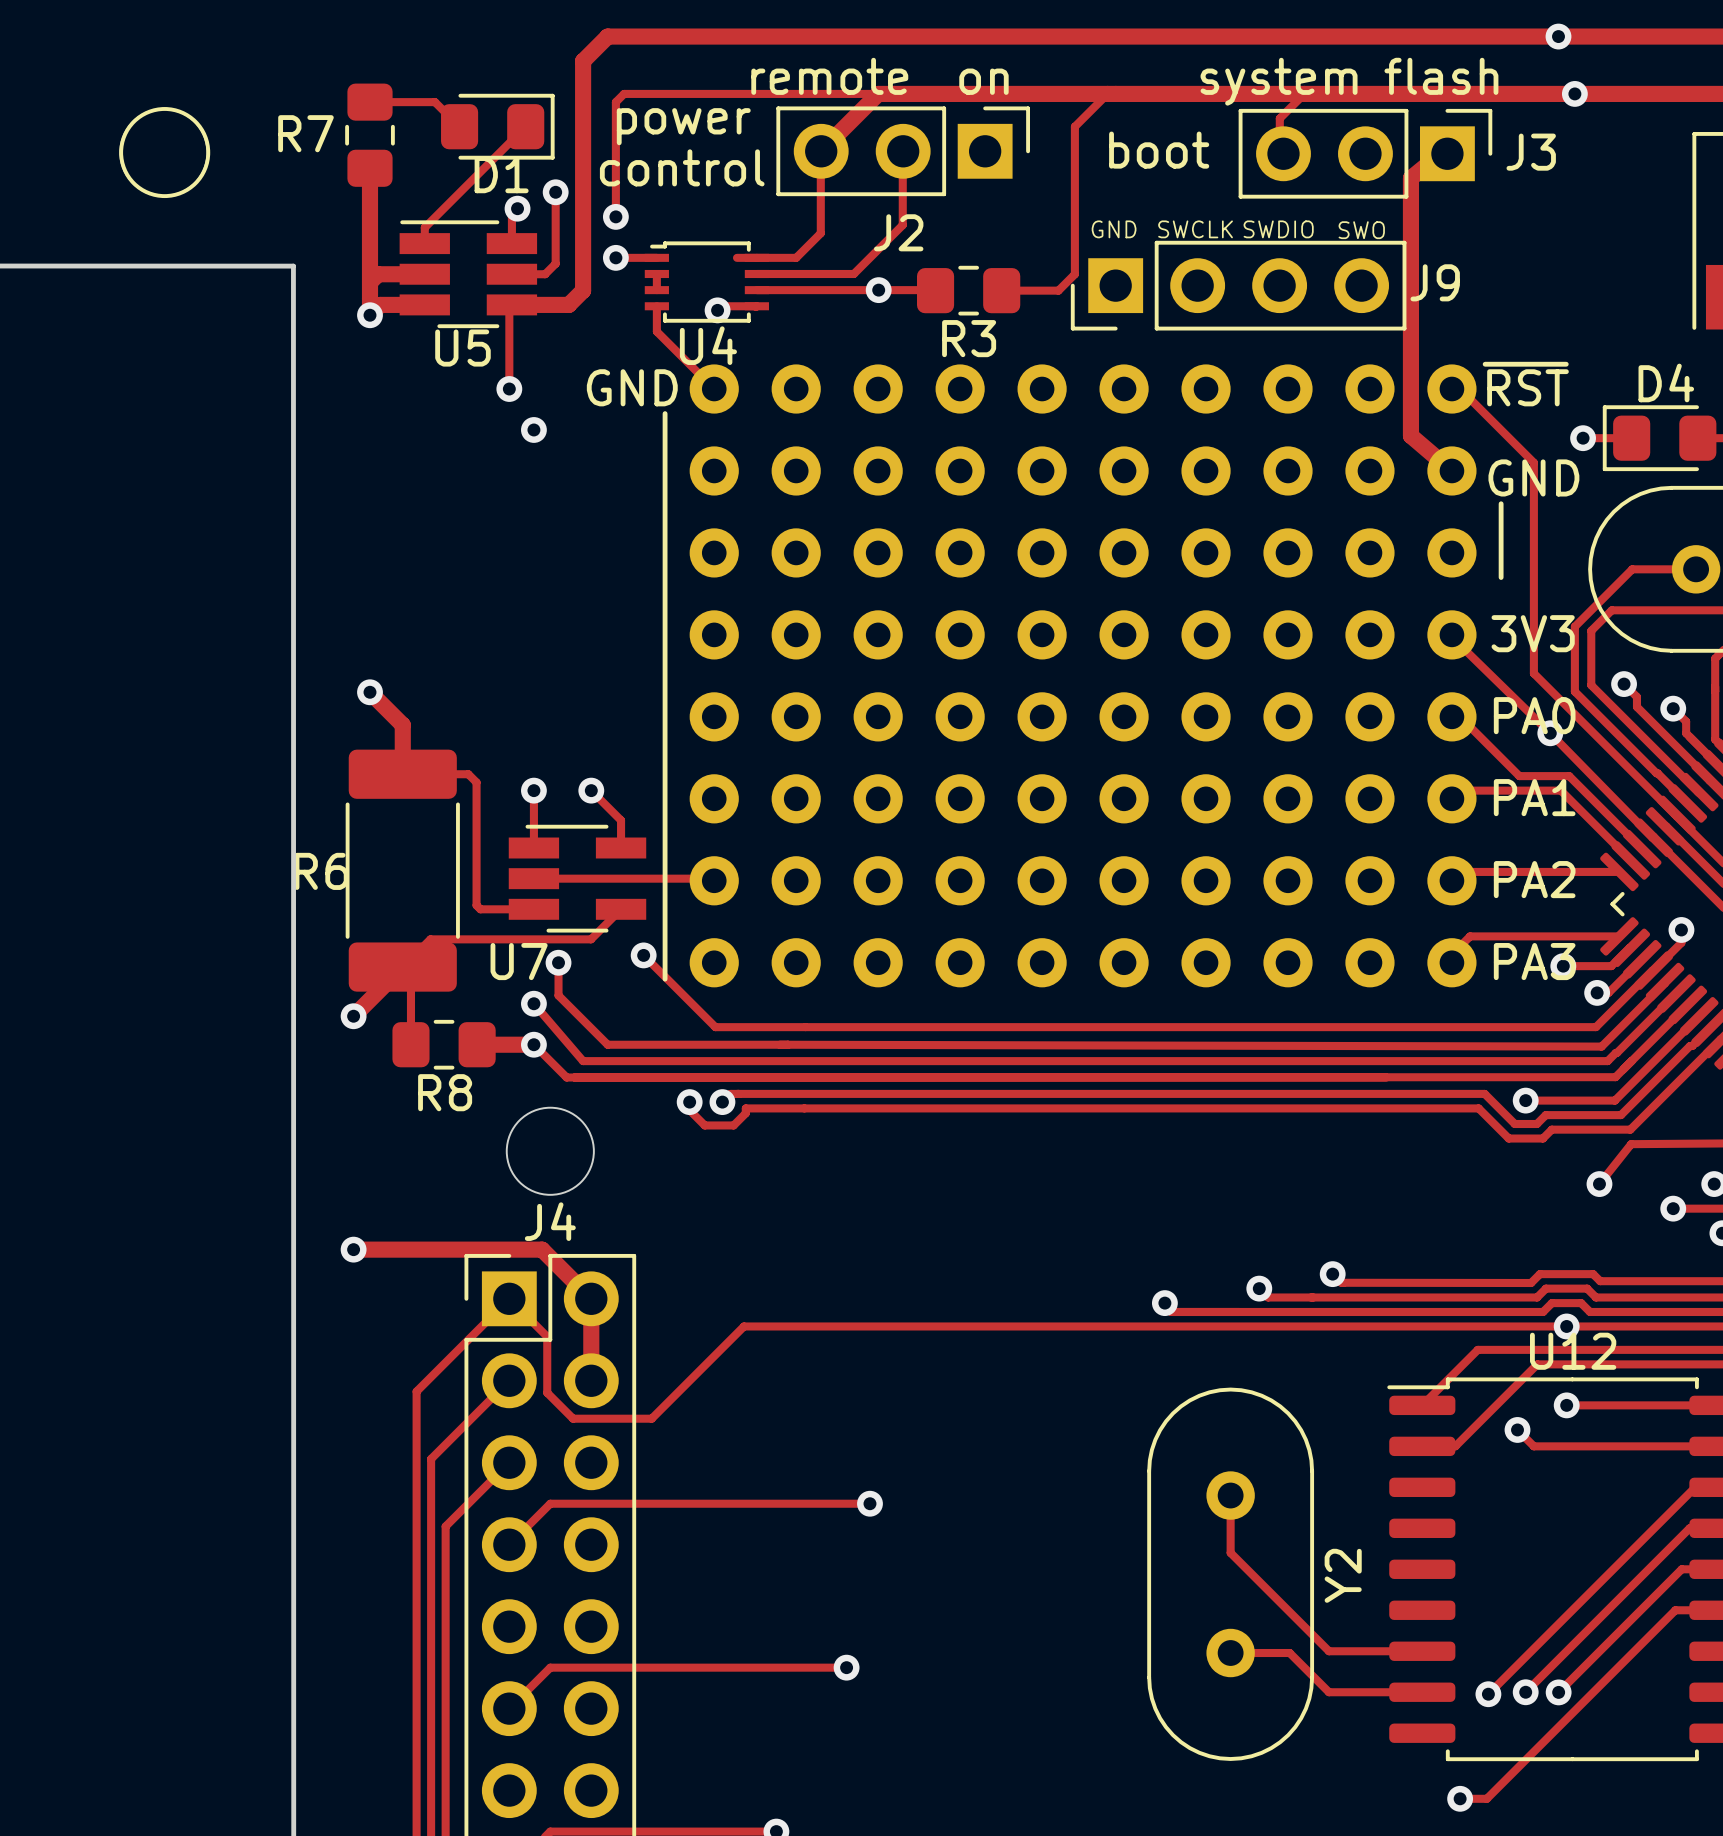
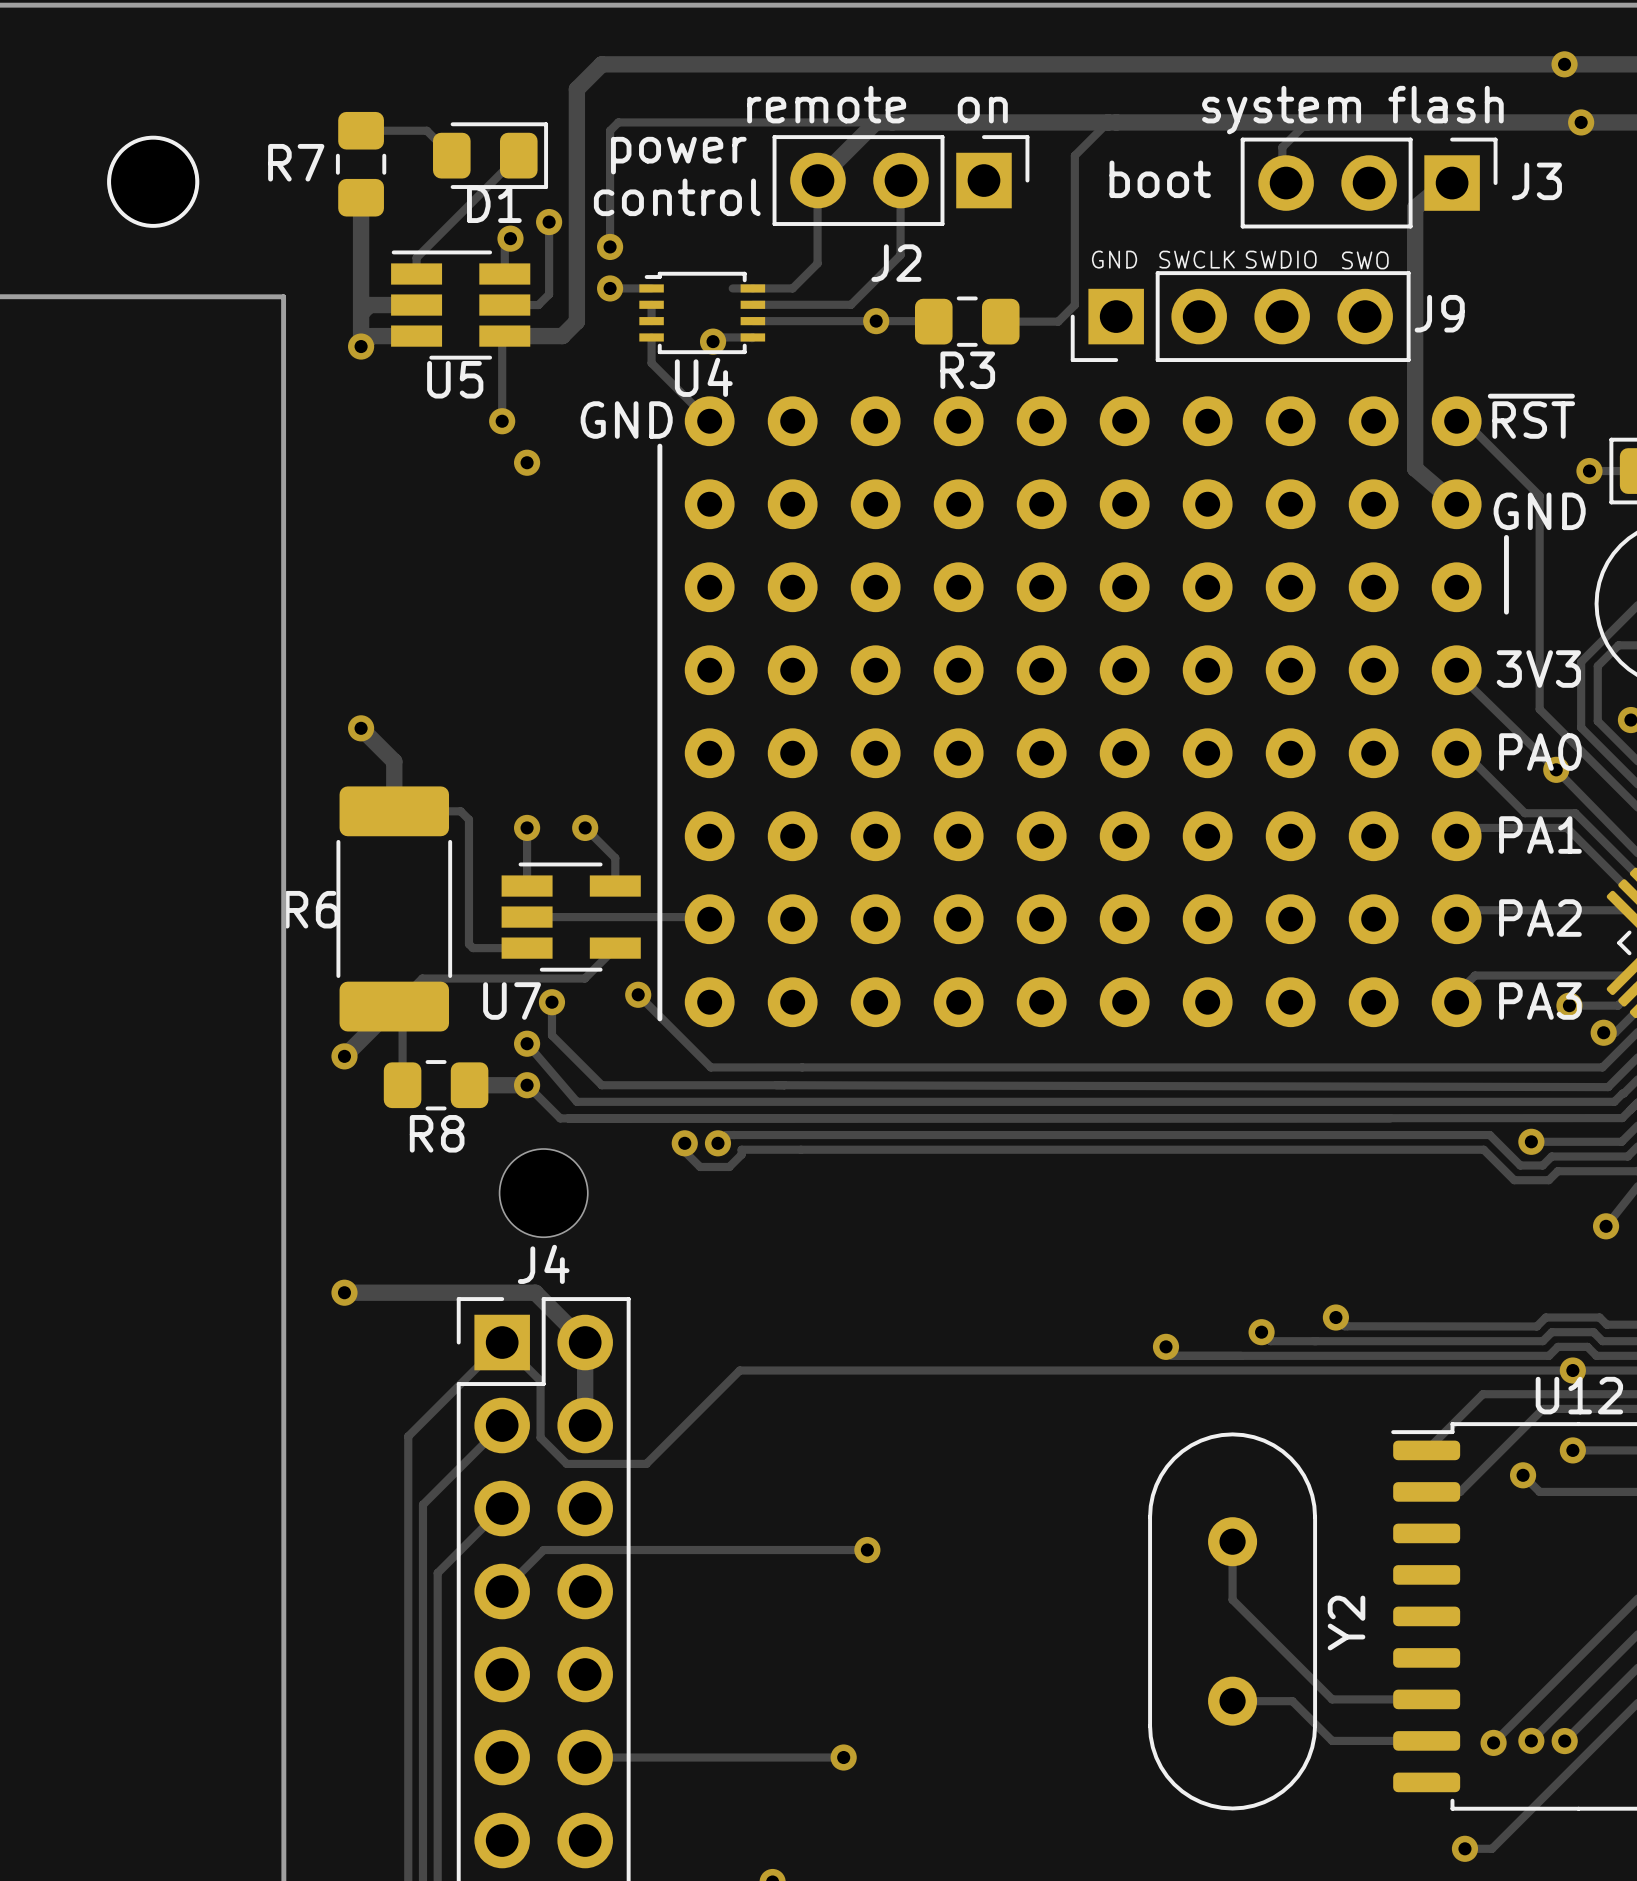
track: (846, 1667) (550, 1667) (509, 1708) -> none
via position: (846, 1667) -> (843, 1757)
track: none -> (585, 1757) (843, 1757)

